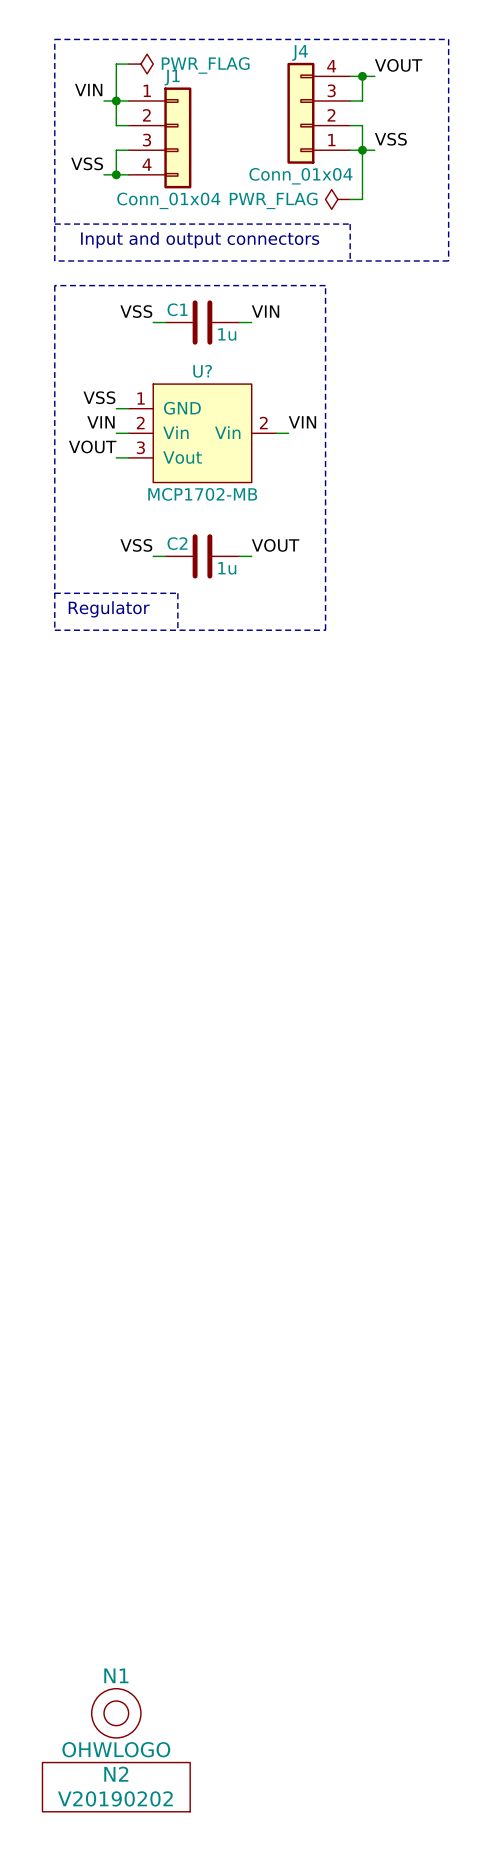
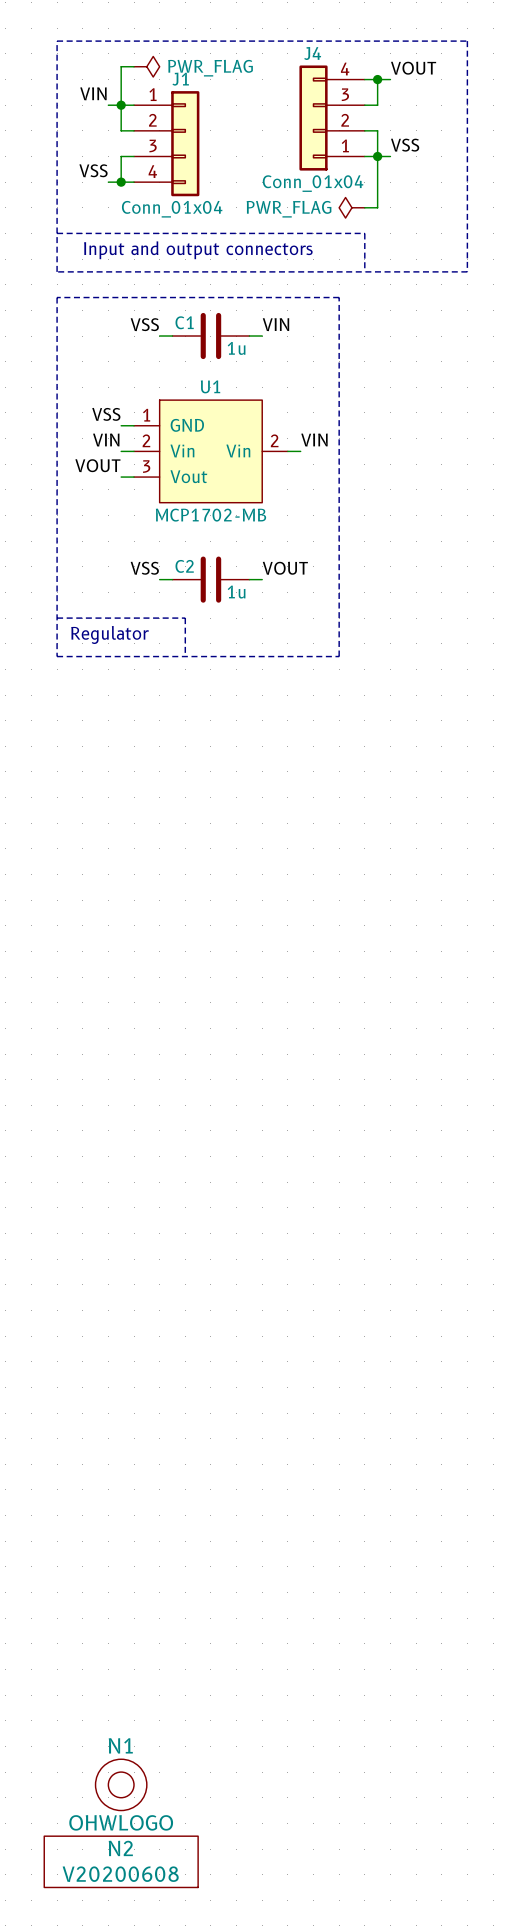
U? name: U? (202, 371) -> U1 (210, 386)
N2 value: V20190202 (115, 1798) -> V20200608 (120, 1874)

